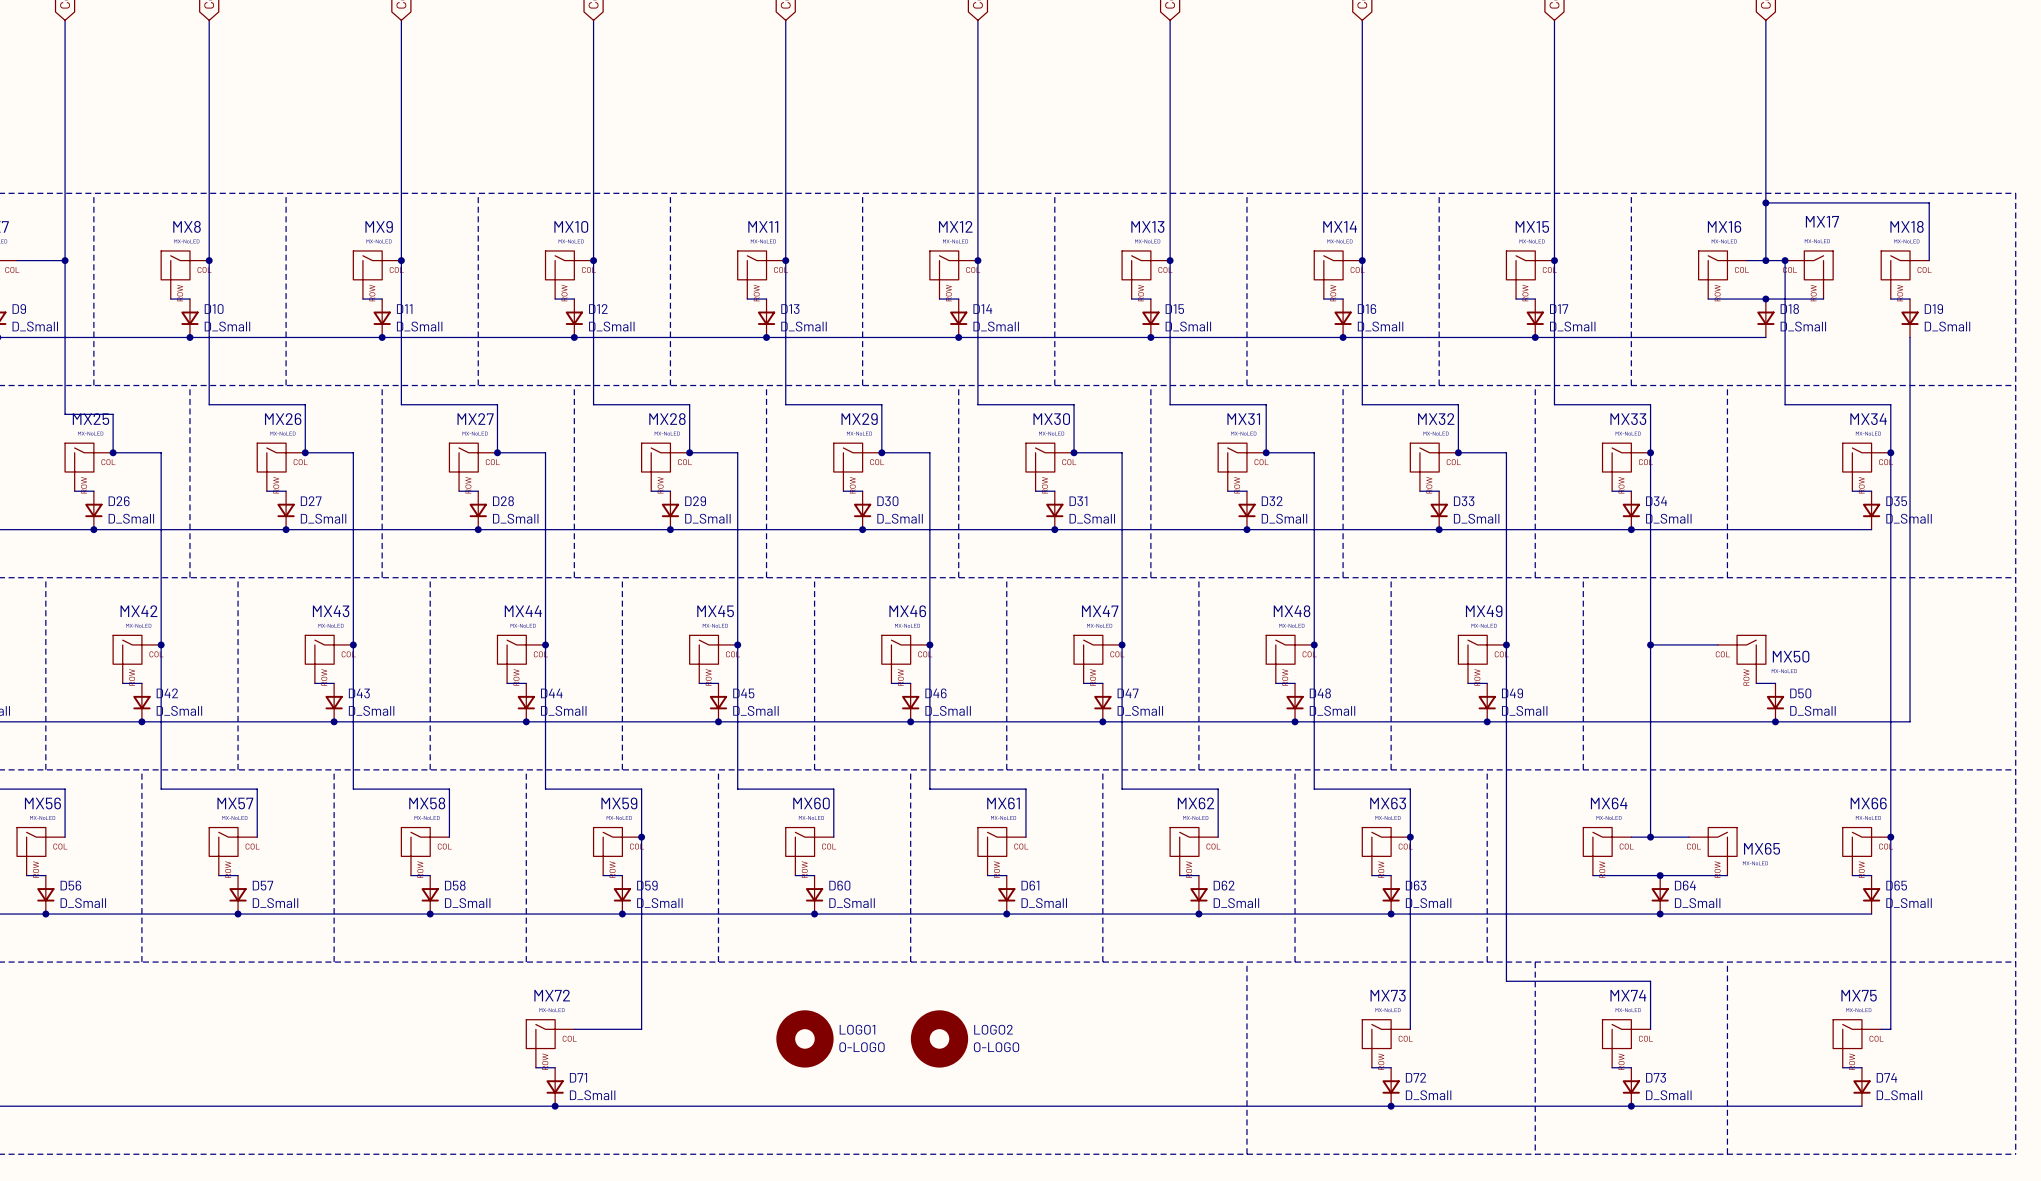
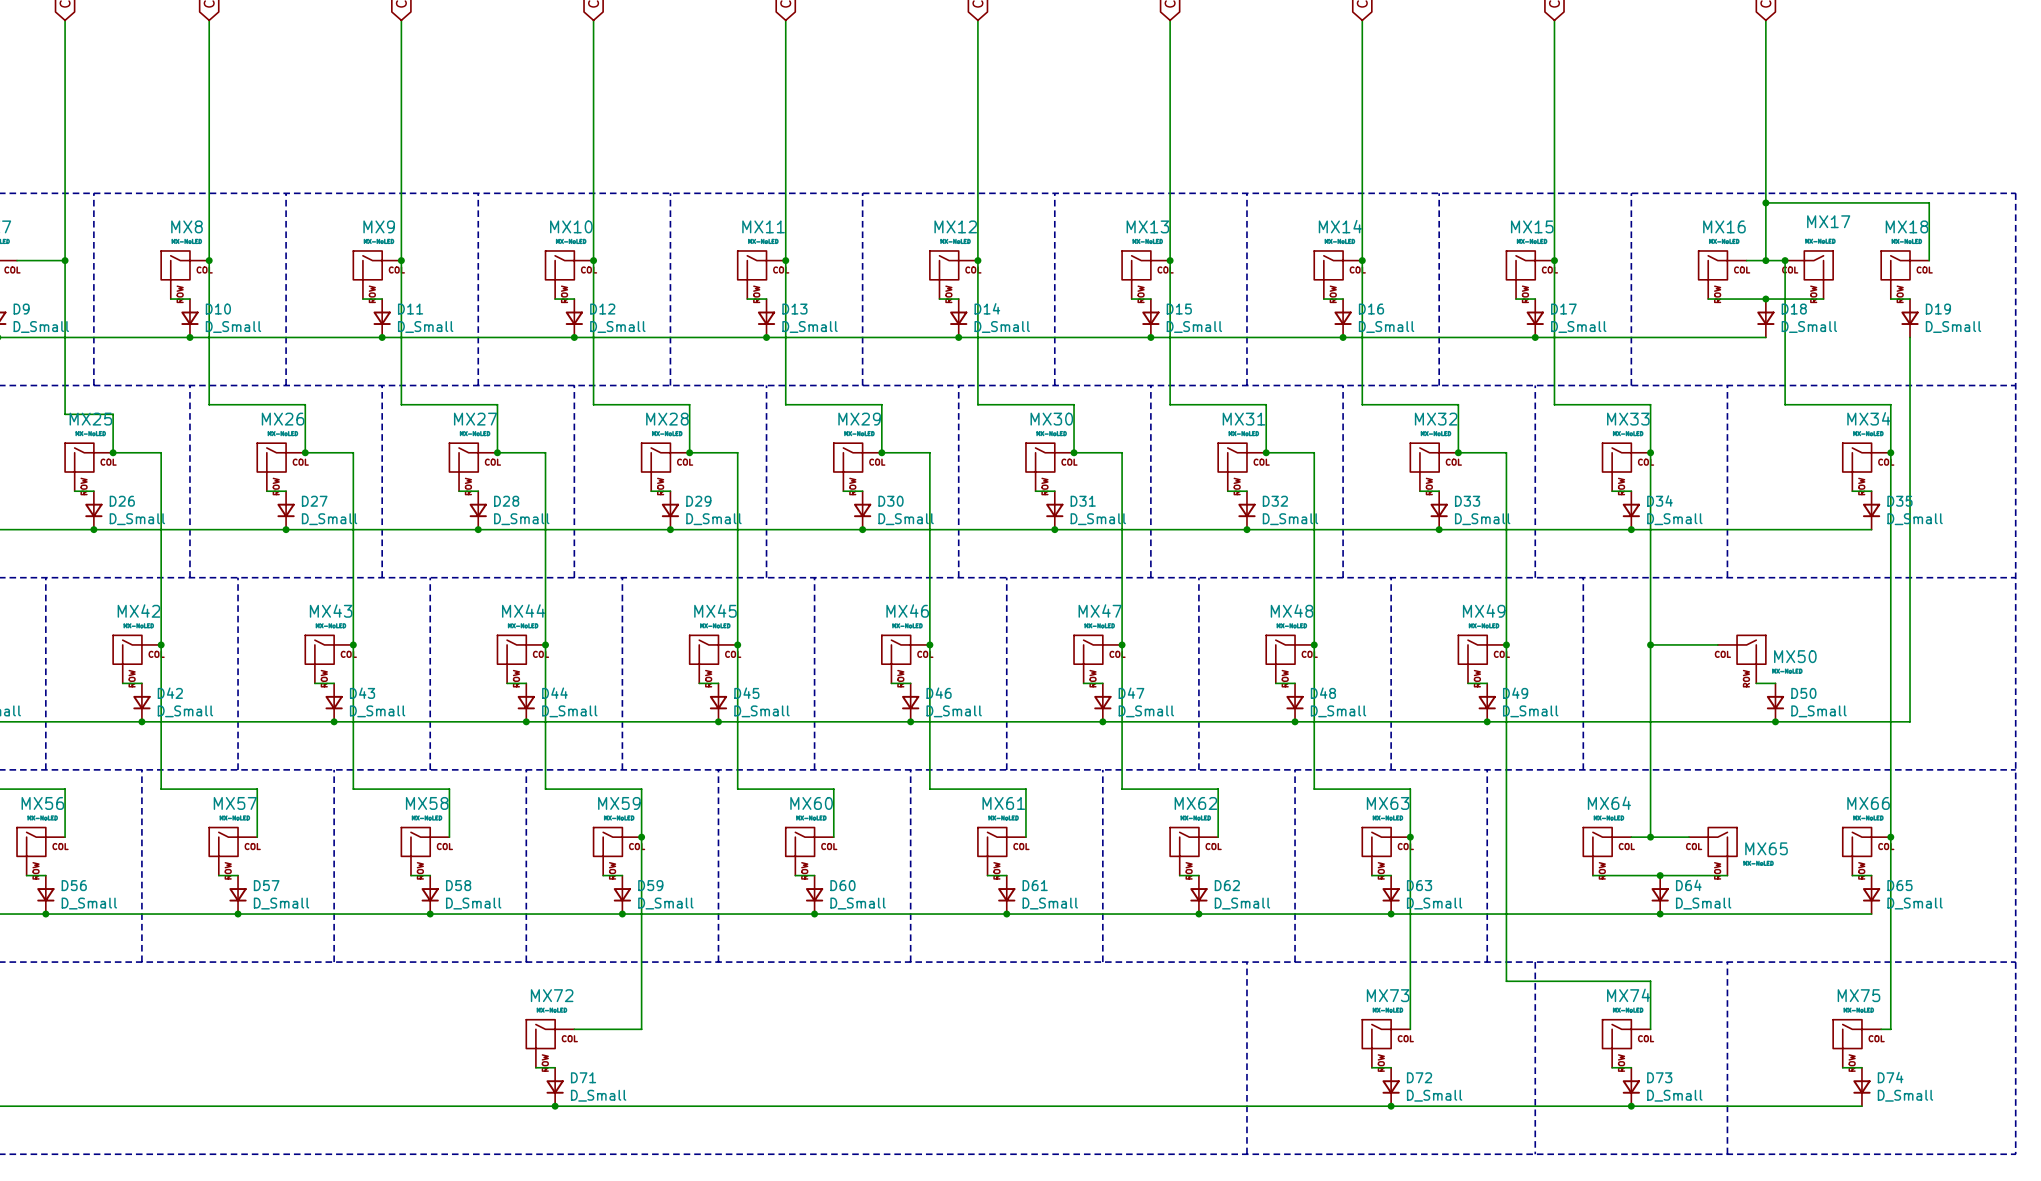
LOGO1: O-LOGO (804, 1038) -> none
LOGO2: O-LOGO (939, 1038) -> none

